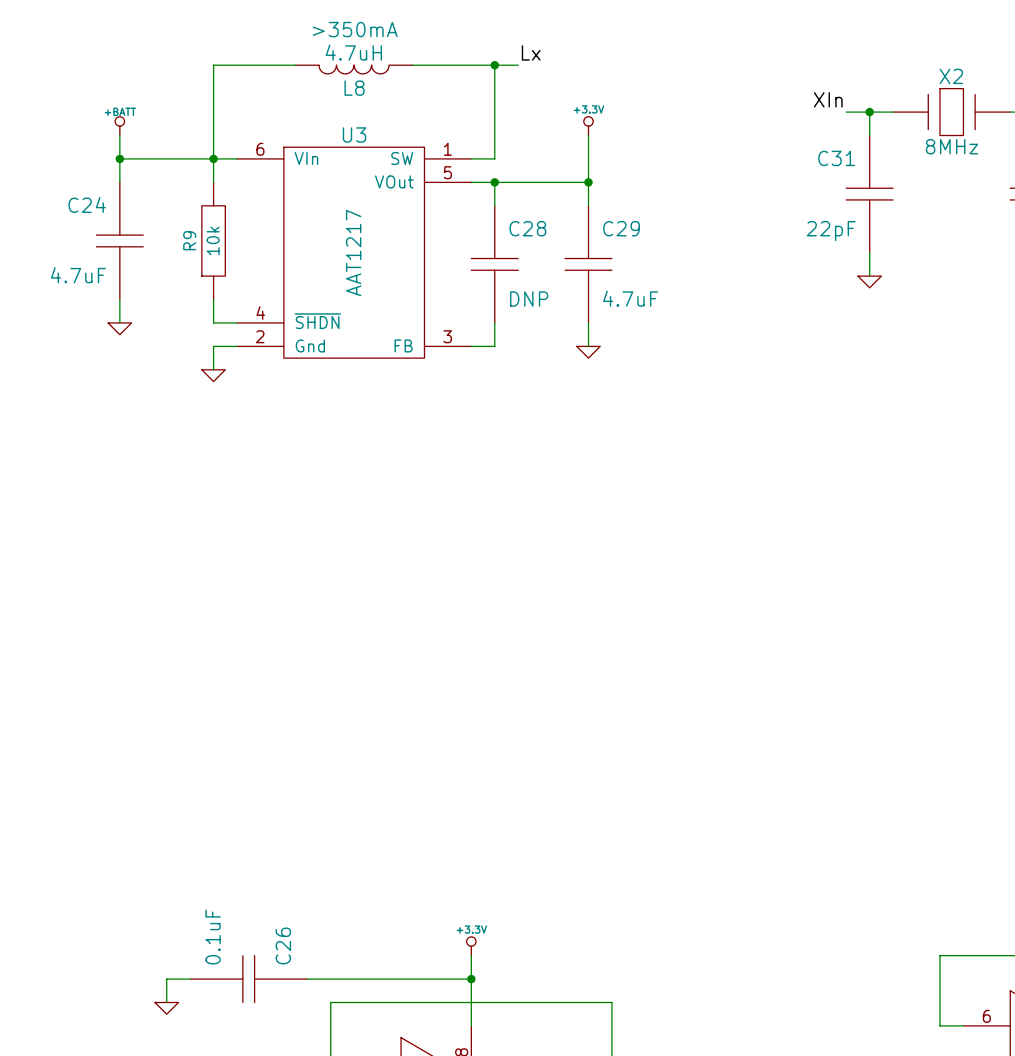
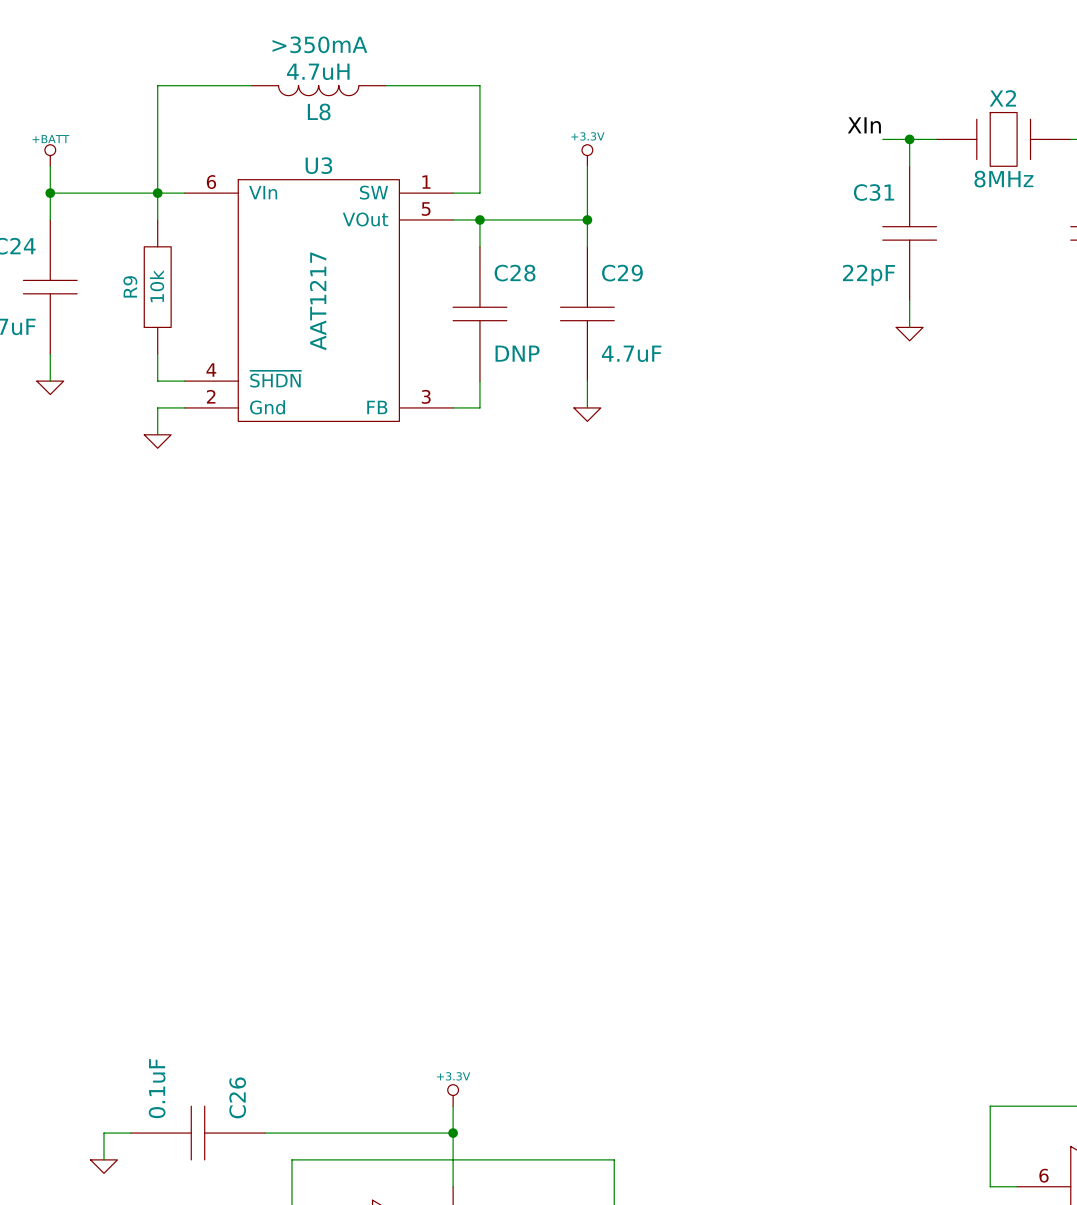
label: Lx (531, 52) -> none
wire: (494, 65) (518, 65) -> none
junction: (494, 65) -> none

